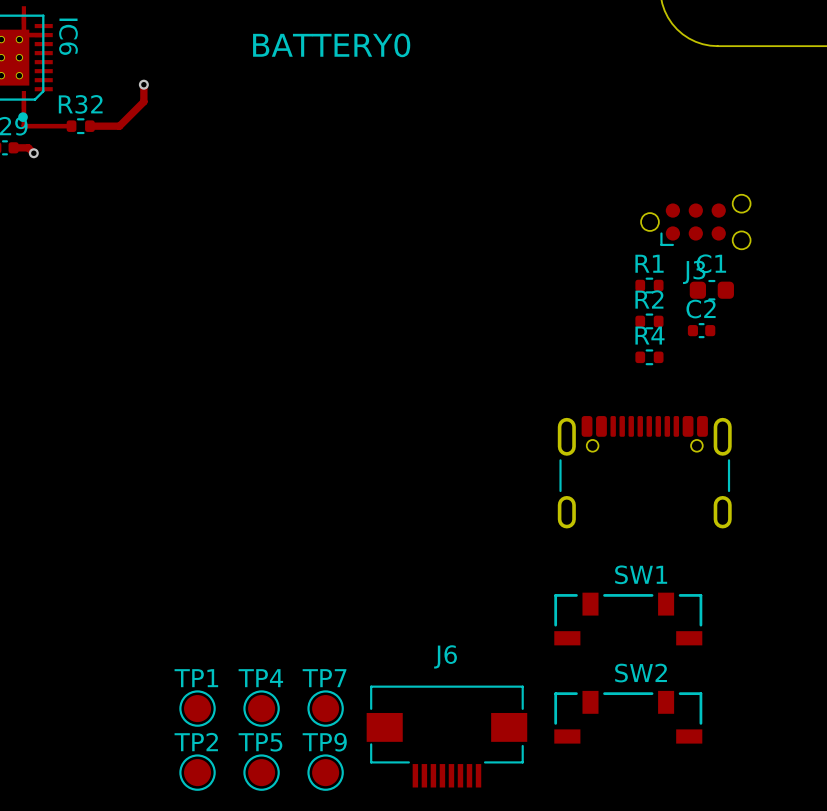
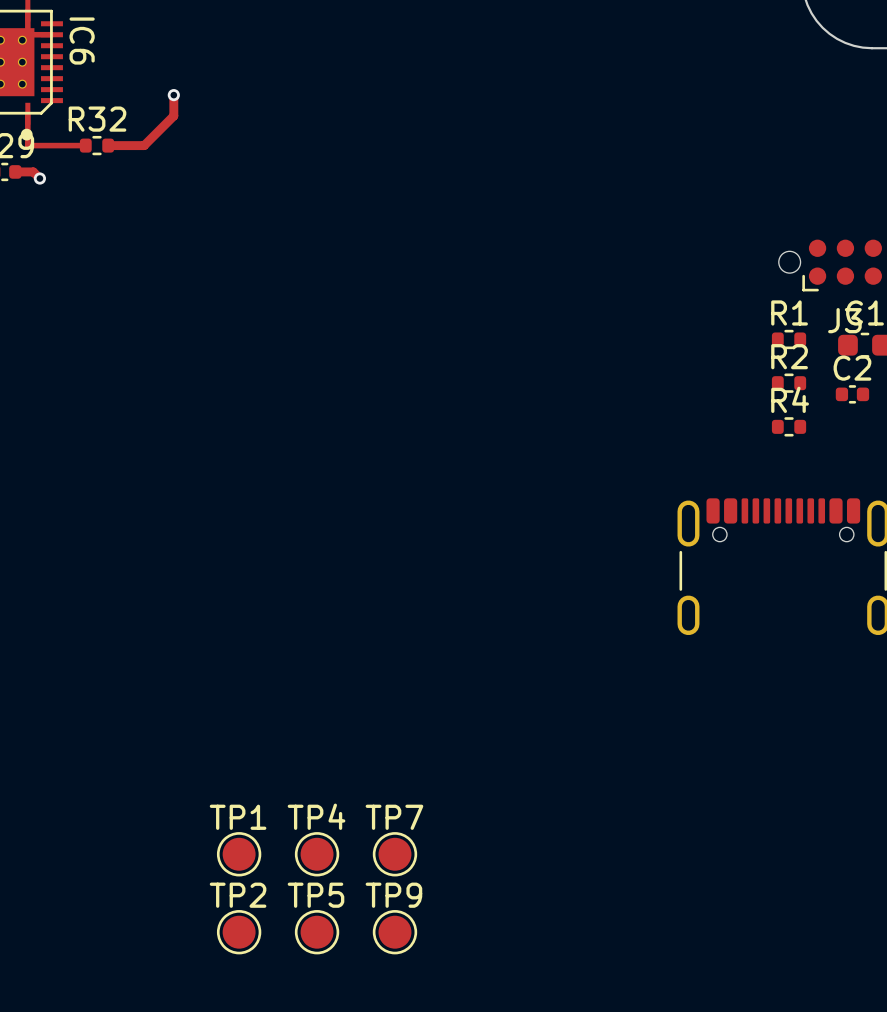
BATTERY0: (331, 45) -> none
SW1: (628, 619) -> none
SW2: (628, 717) -> none
J6: (446, 736) -> none

